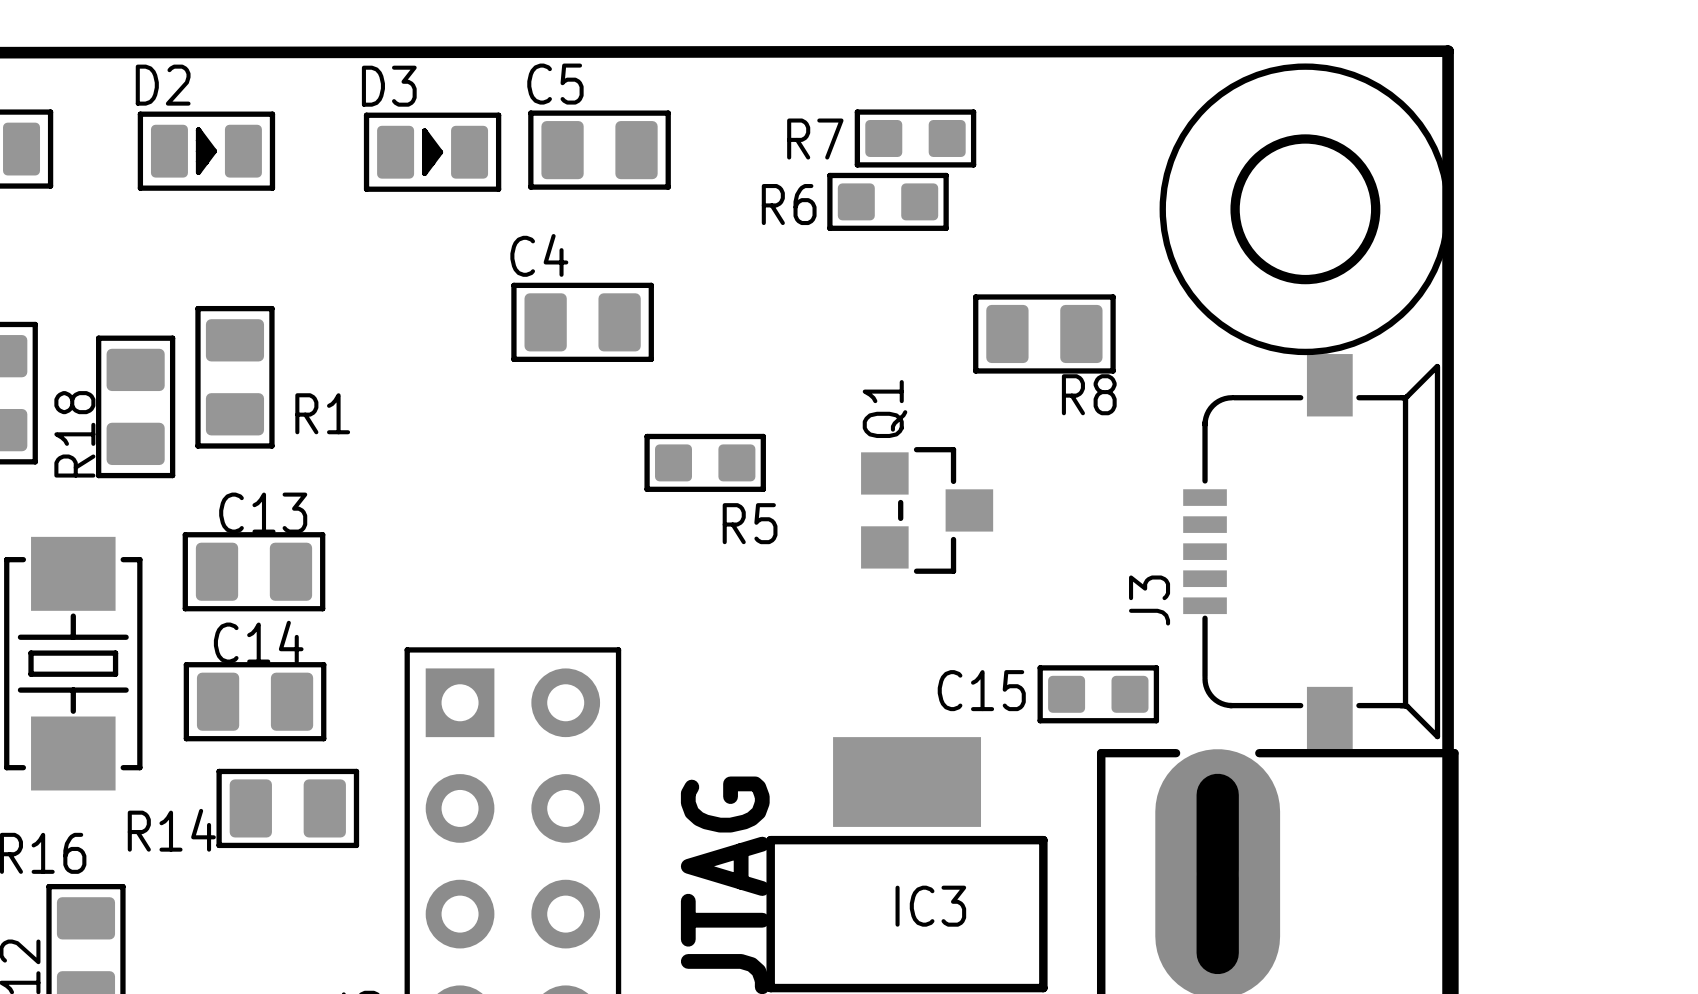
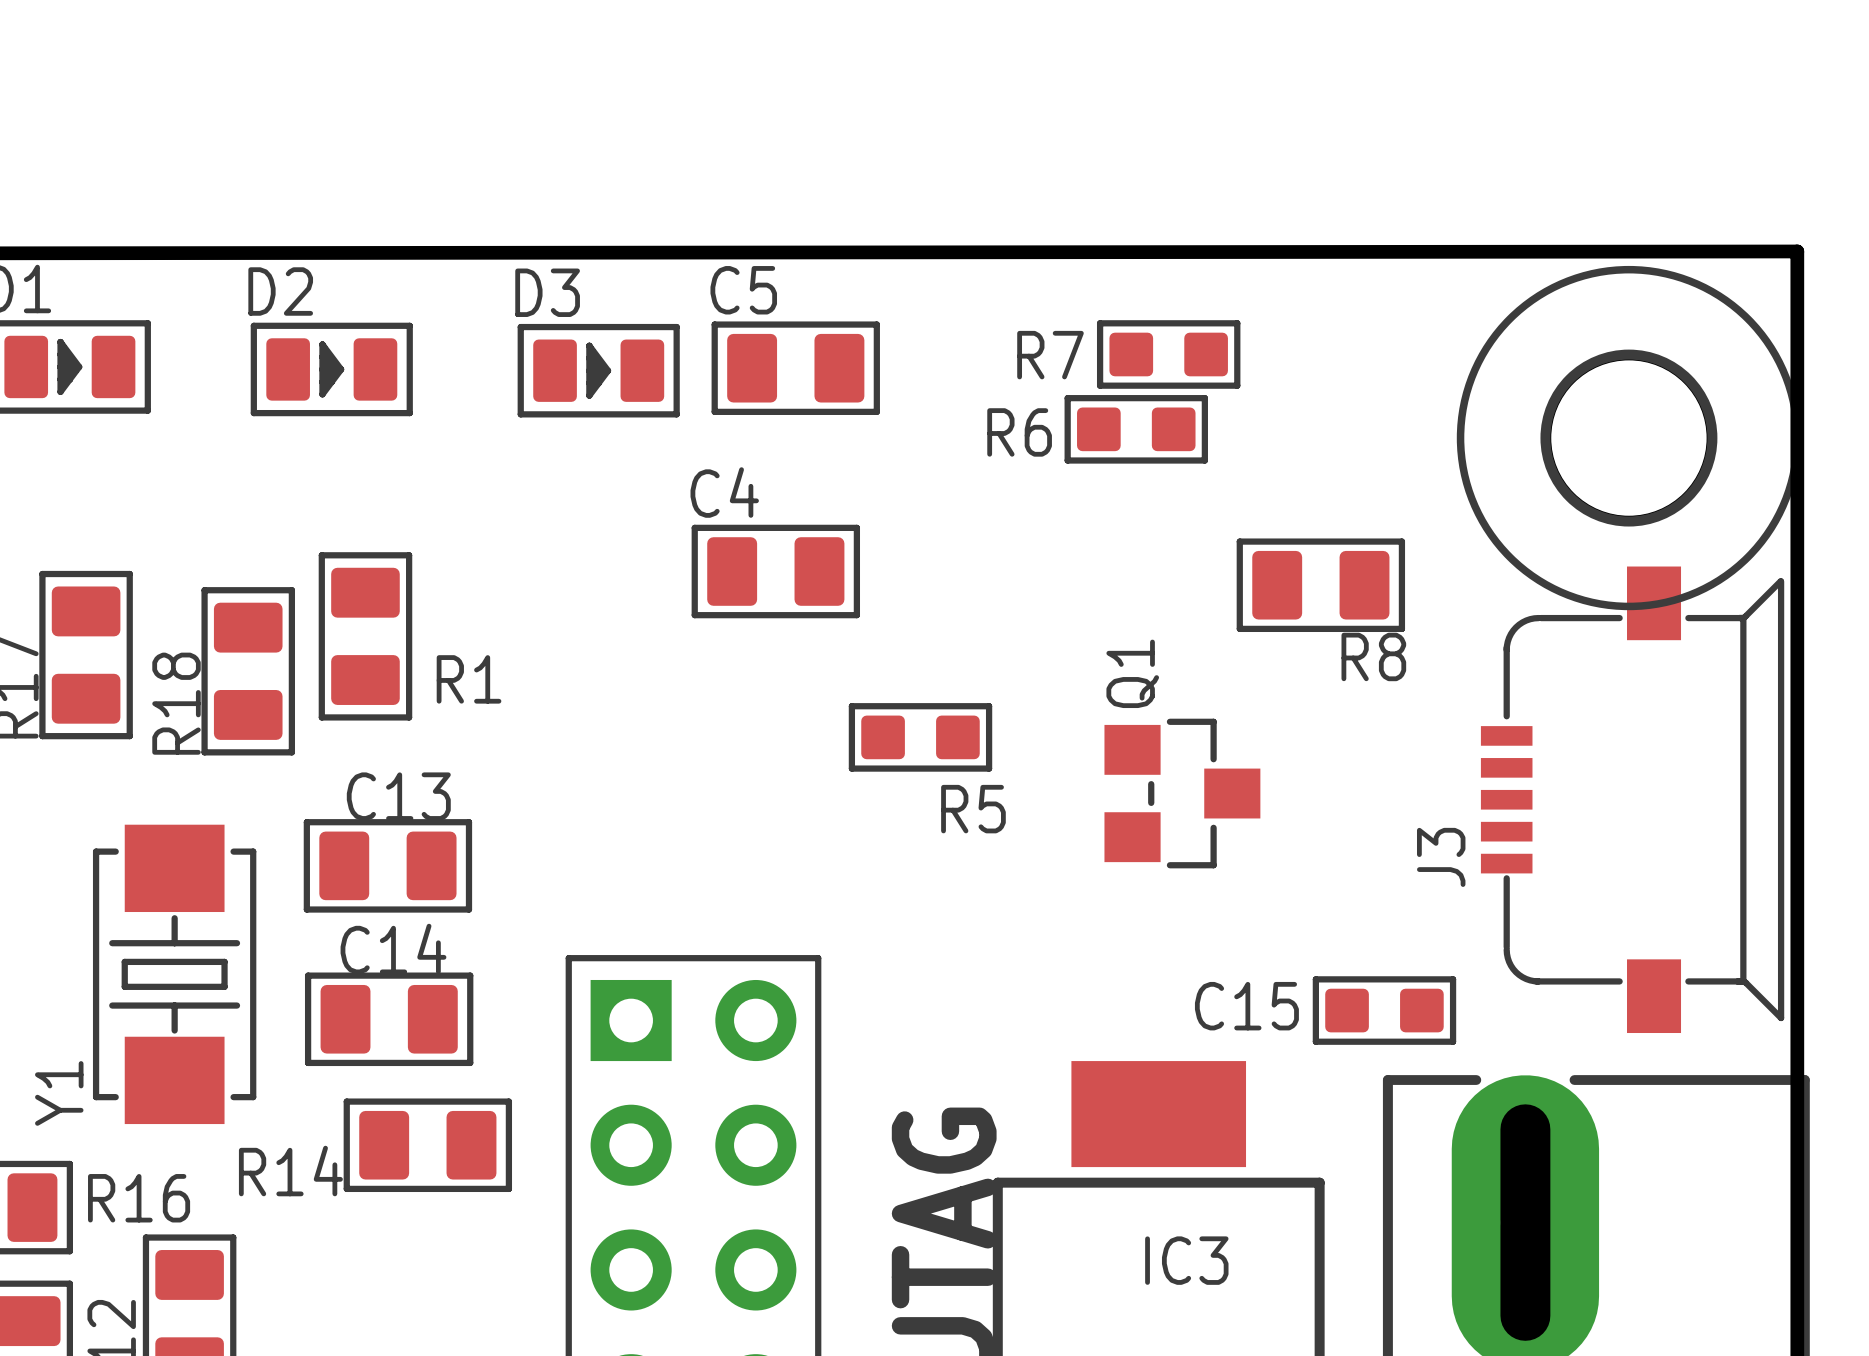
J3 position: (1311, 551) -> (1632, 799)

